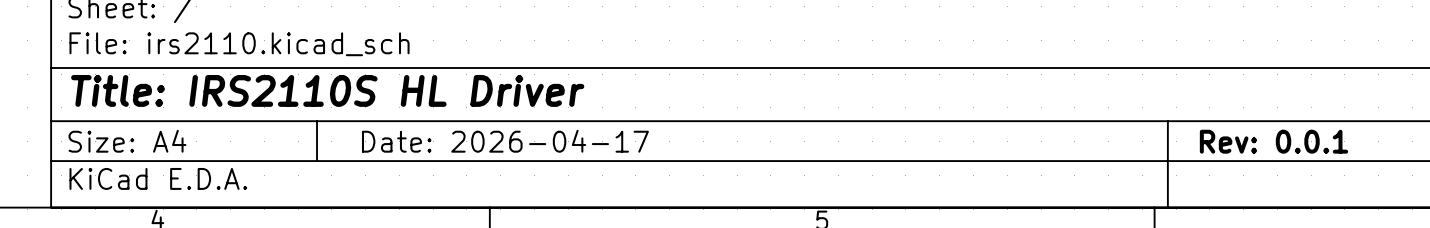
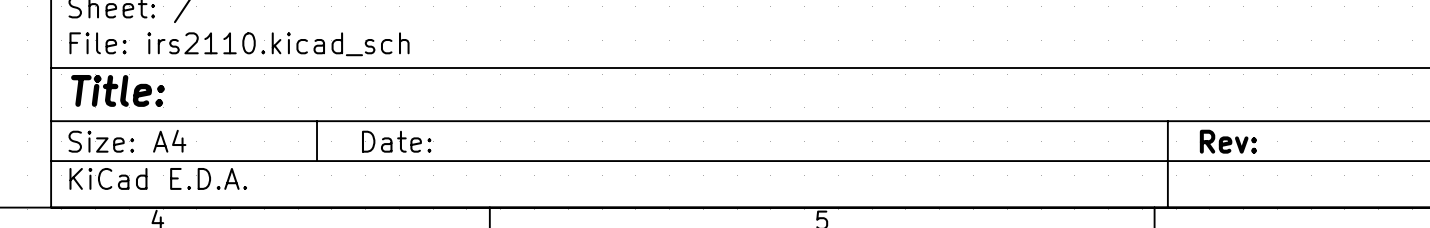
title block: Title: IRS2110S HL Driver (327, 90) -> Title: (118, 90)
title block: Date: 2026-04-17 (505, 141) -> Date: (396, 141)
title block: Rev: 0.0.1 (1274, 141) -> Rev: (1228, 141)

